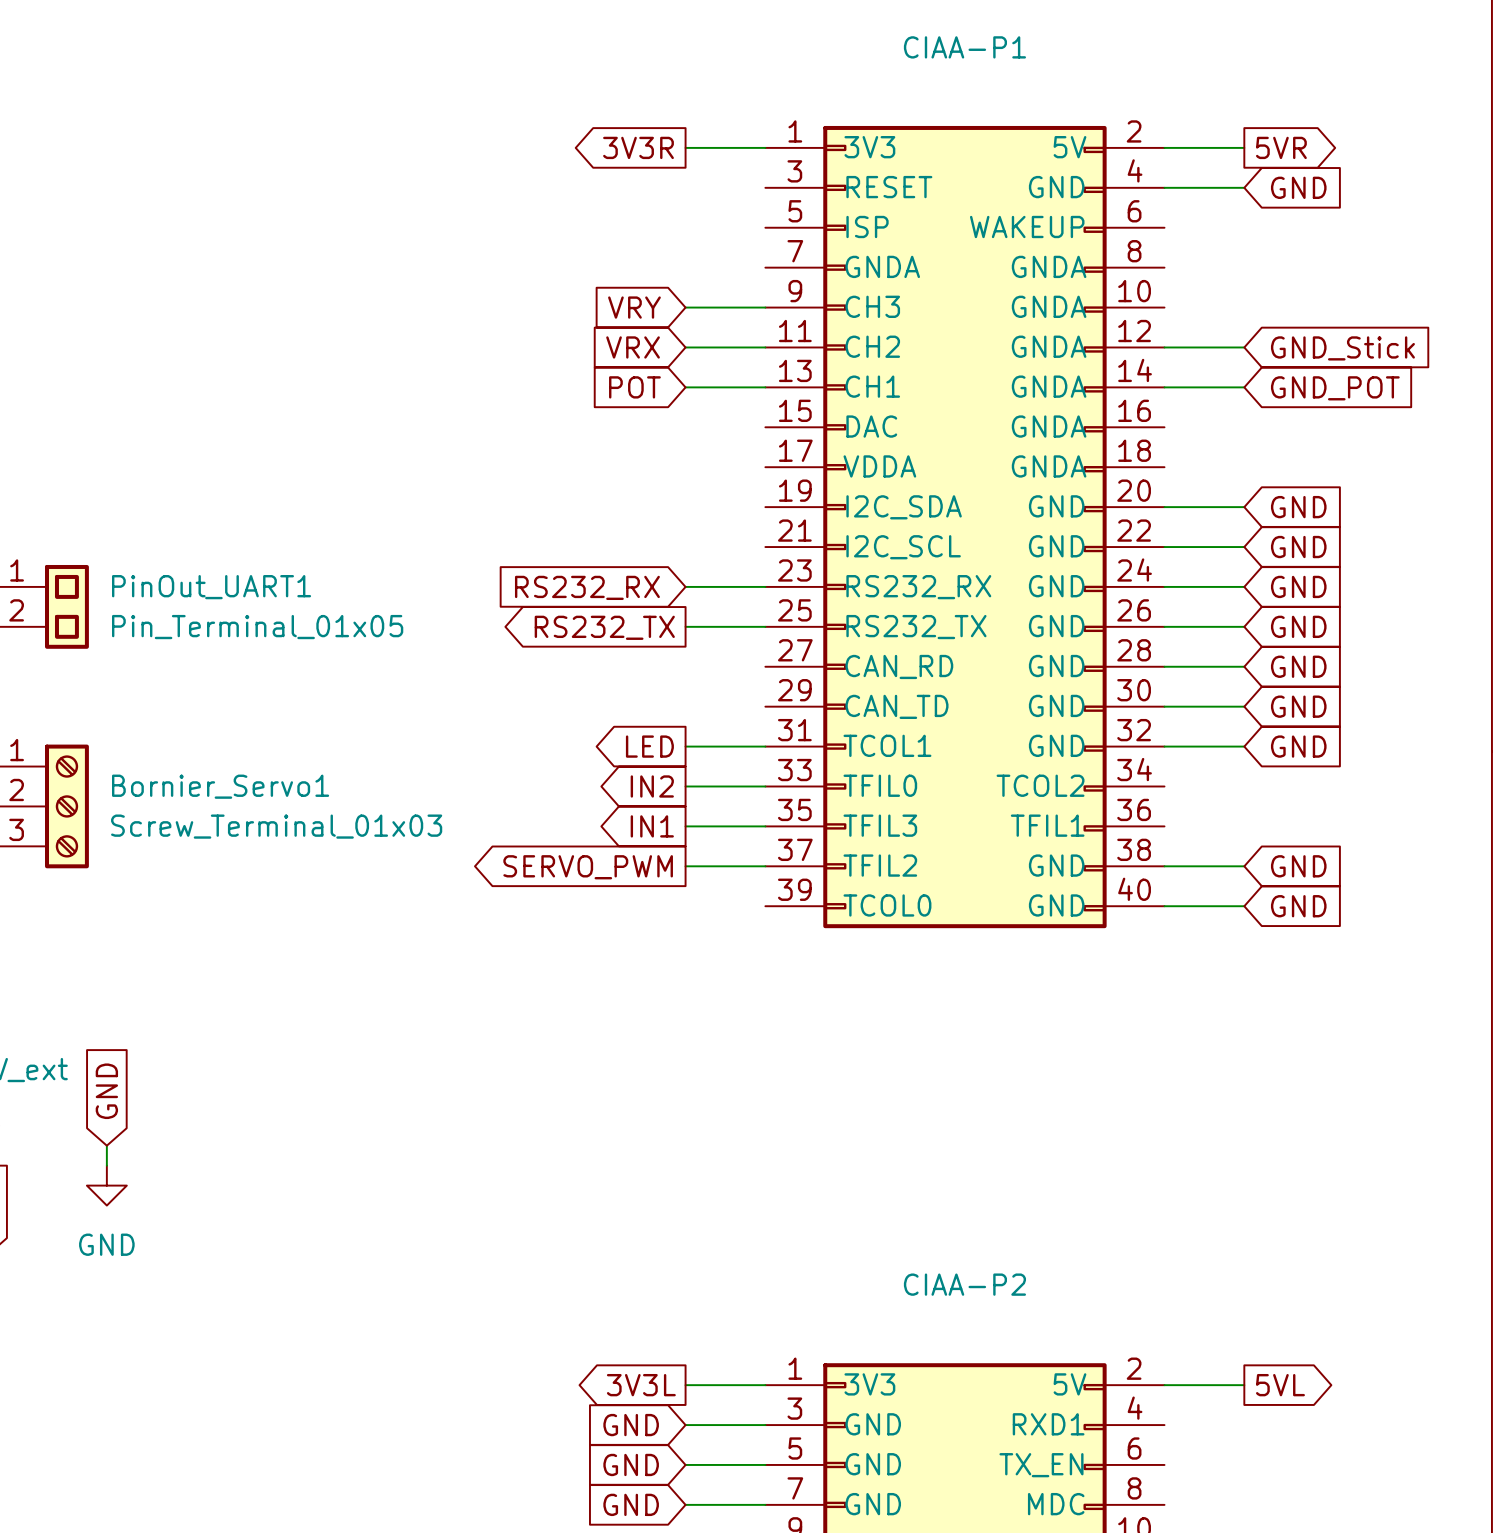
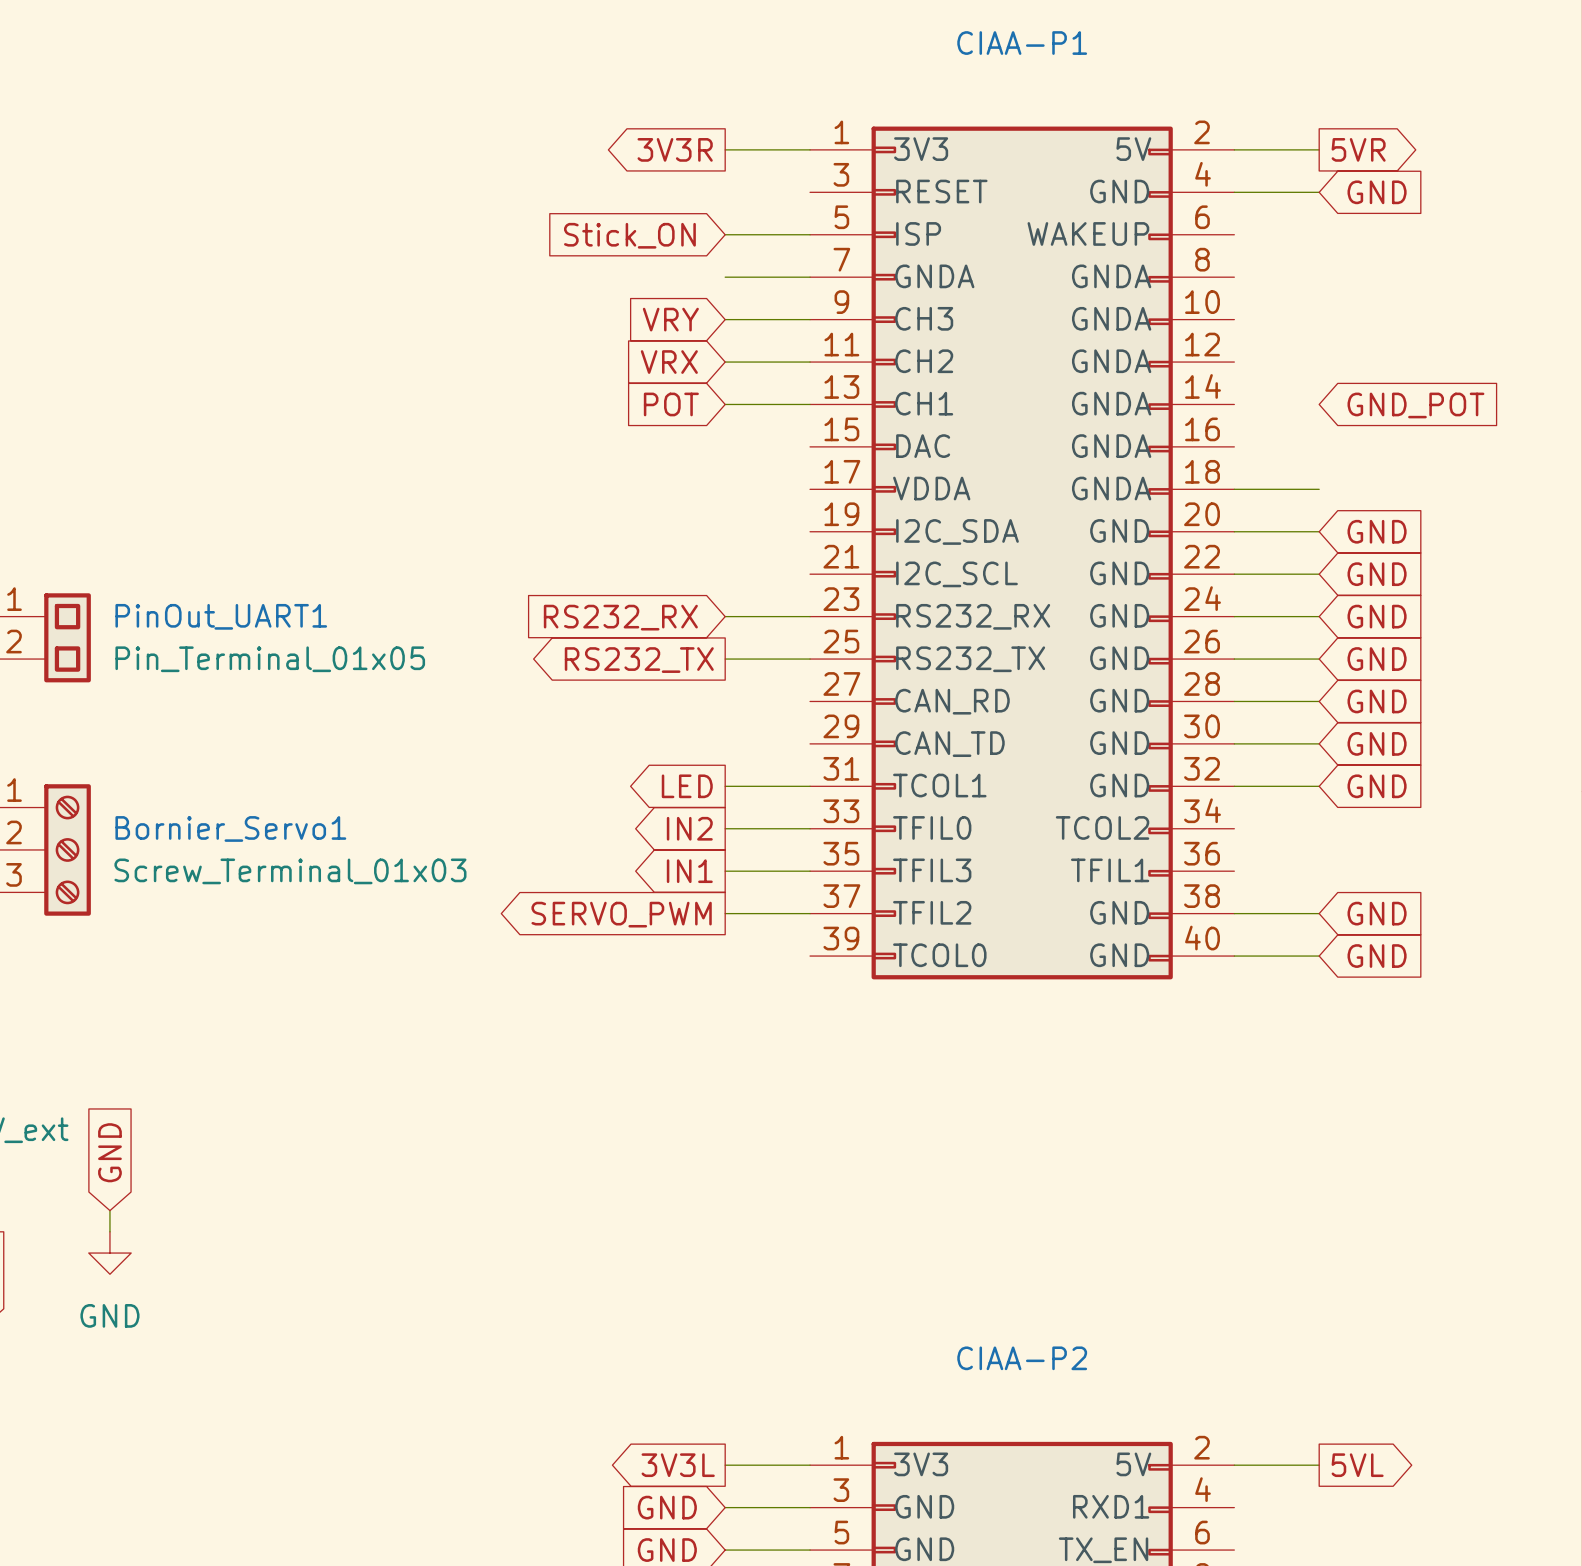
wire: none -> (725, 234) (810, 234)
global label: none -> Stick_ON (629, 235)
wire: none -> (725, 277) (810, 277)
wire: (1164, 347) (1244, 347) -> none
global label: GND_Stick (1342, 348) -> none
wire: (1164, 387) (1244, 387) -> (1234, 489) (1319, 489)

